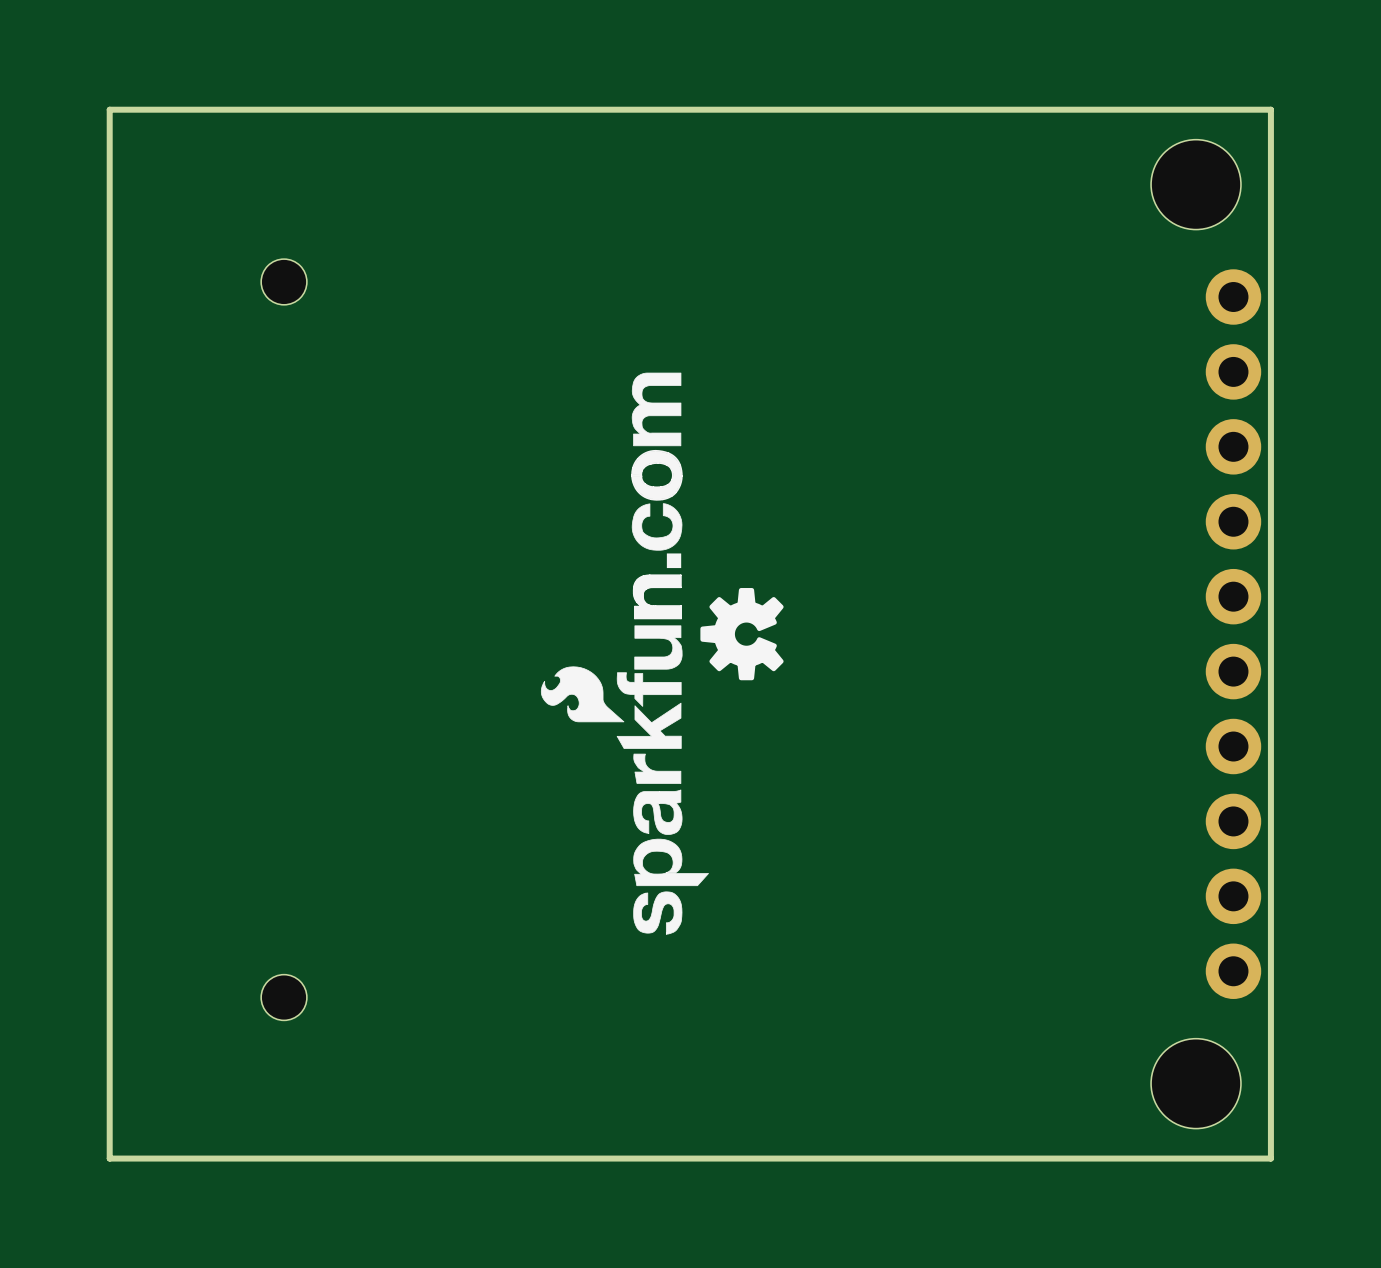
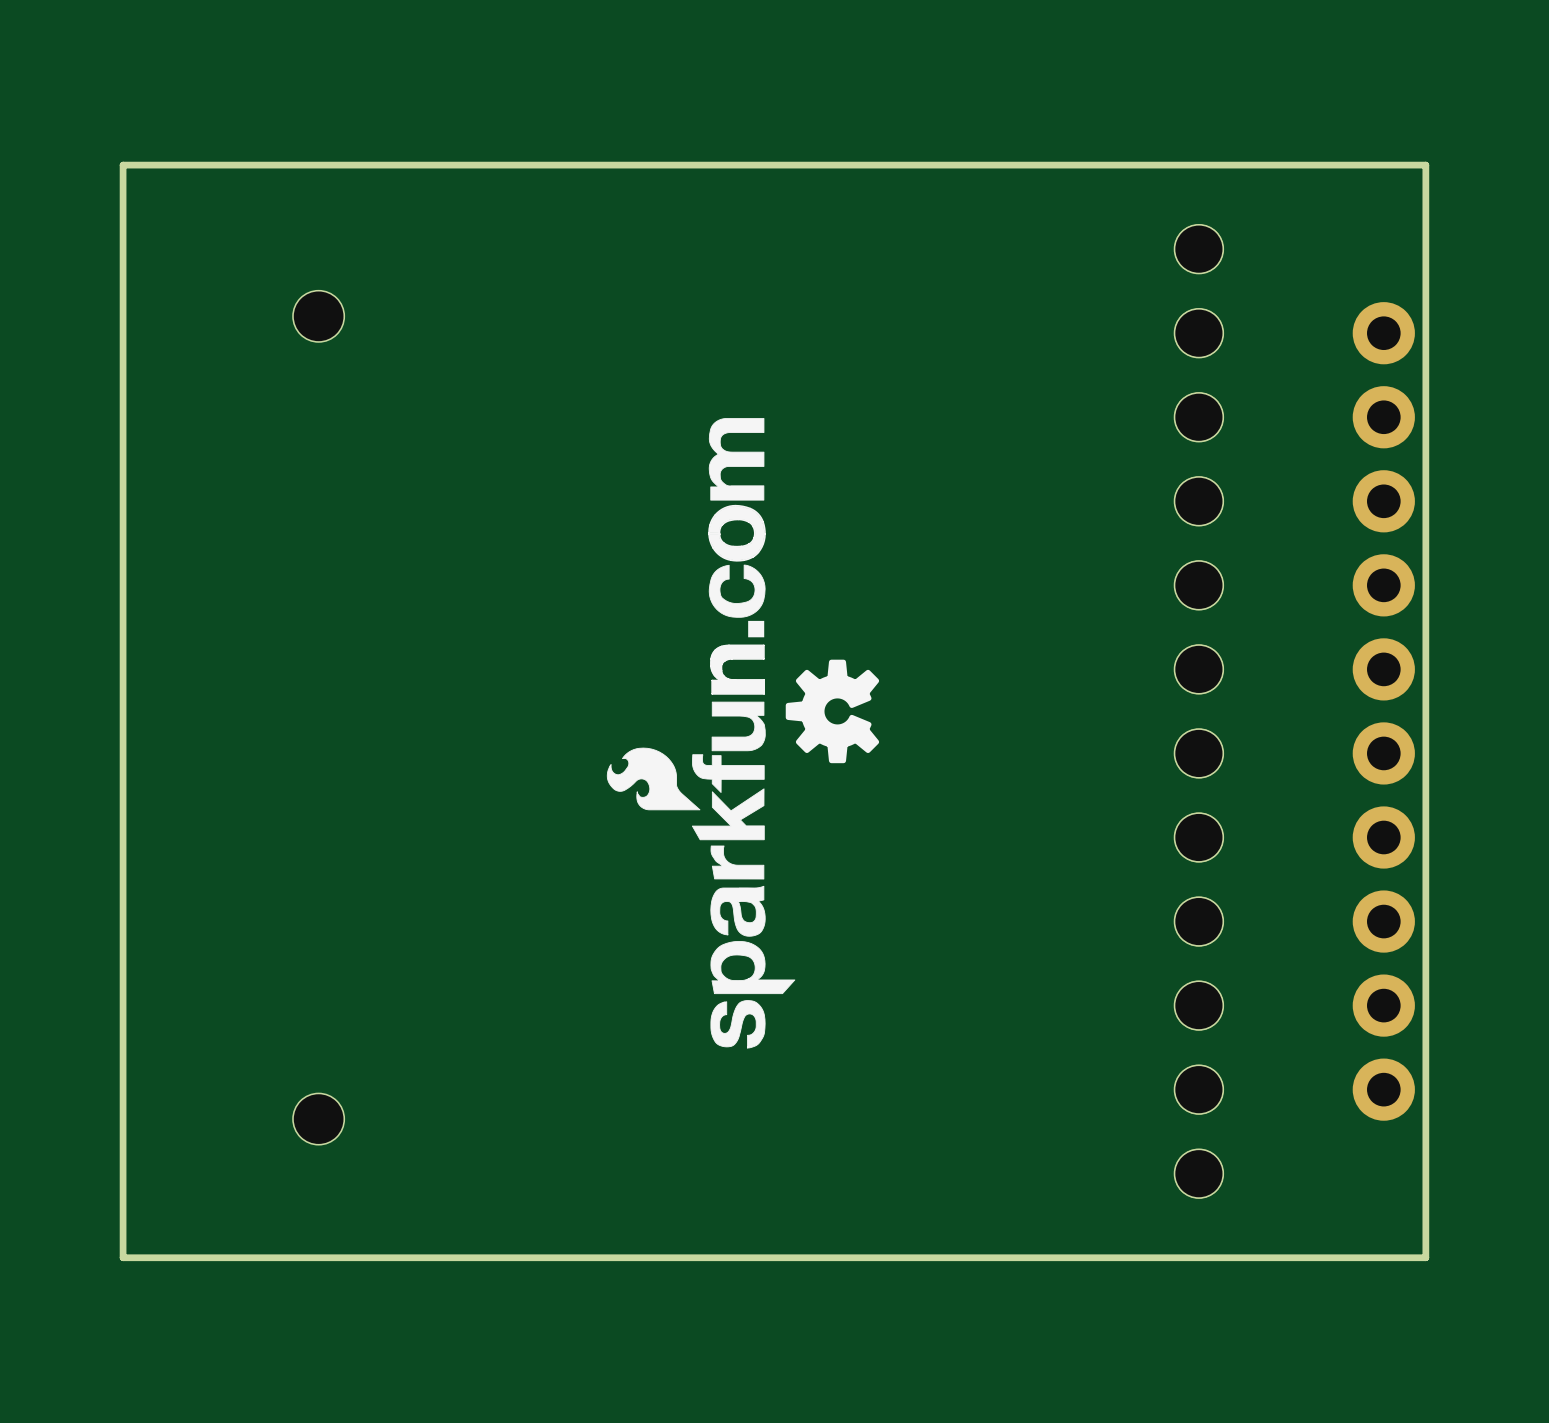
board edge: (1270, 147) (1270, 109) (109, 109) (109, 147) -> (1425, 165) (123, 165)
part: (1196, 184) -> none
part: none -> (1198, 711)
part: (1196, 1083) -> none
board edge: (1270, 1121) (1270, 1158) (109, 1158) (109, 1121) -> (1425, 1257) (123, 1257)

